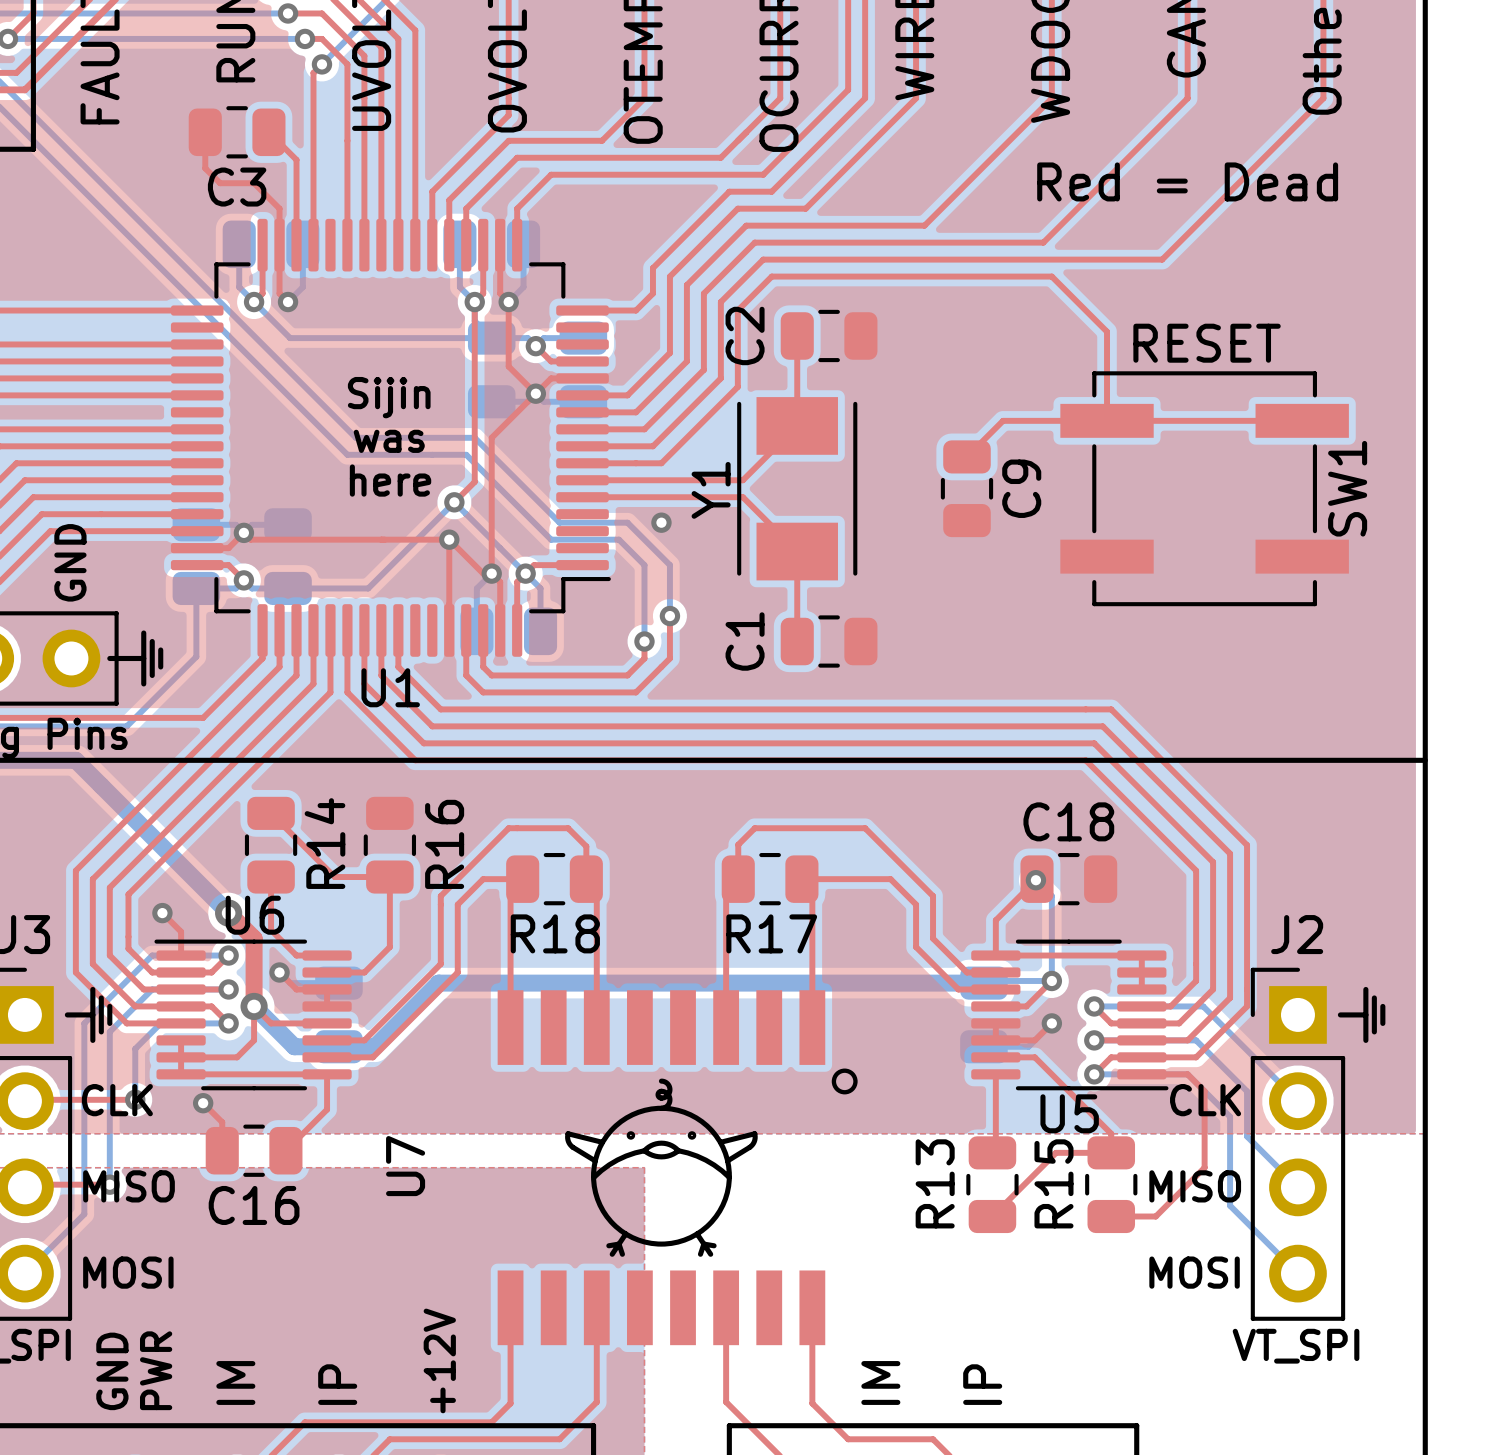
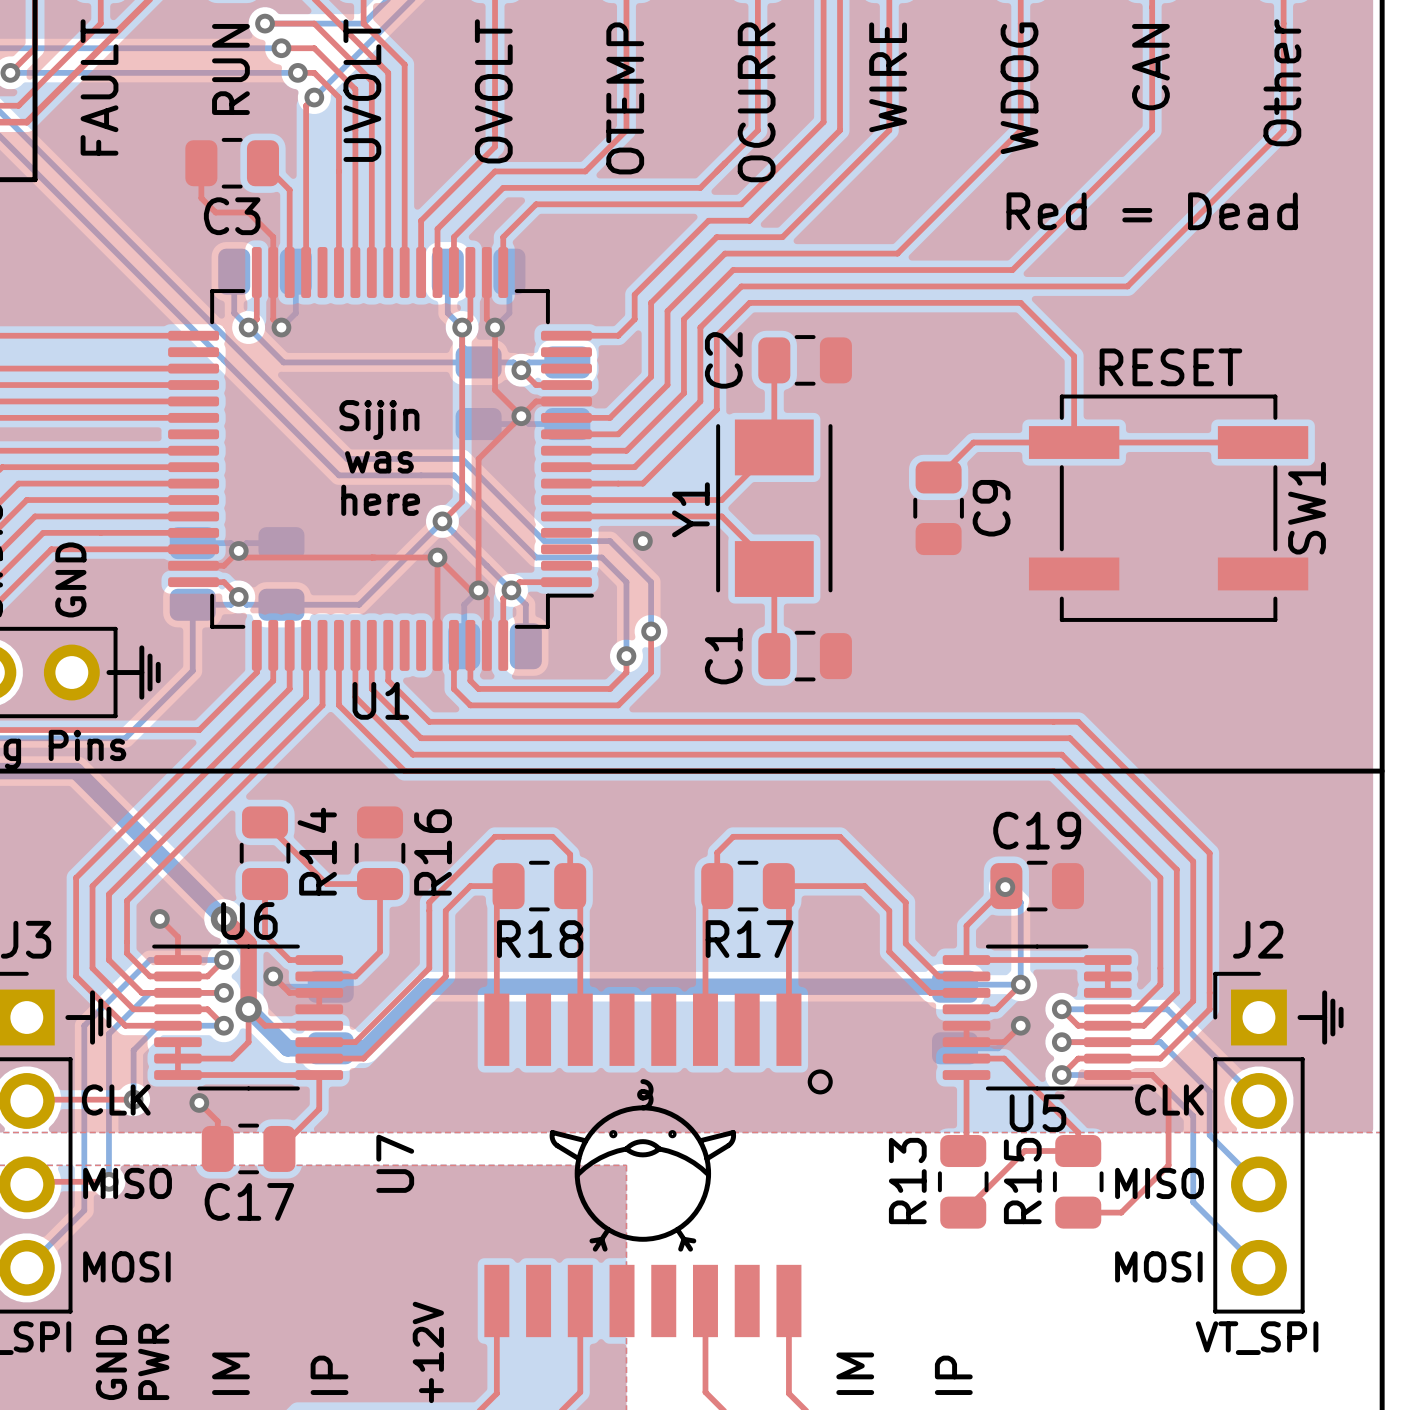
C18 name: C18 (1068, 821) -> C19 (1037, 830)
C16 name: C16 (254, 1205) -> C17 (249, 1201)

